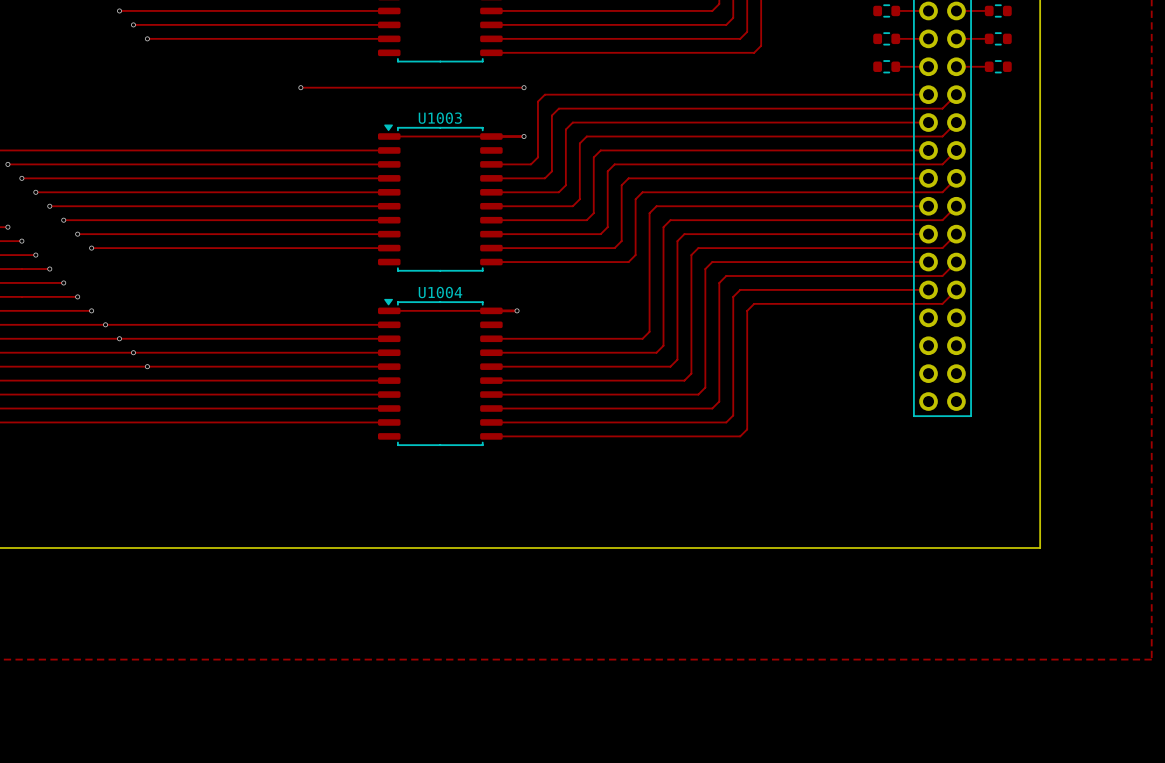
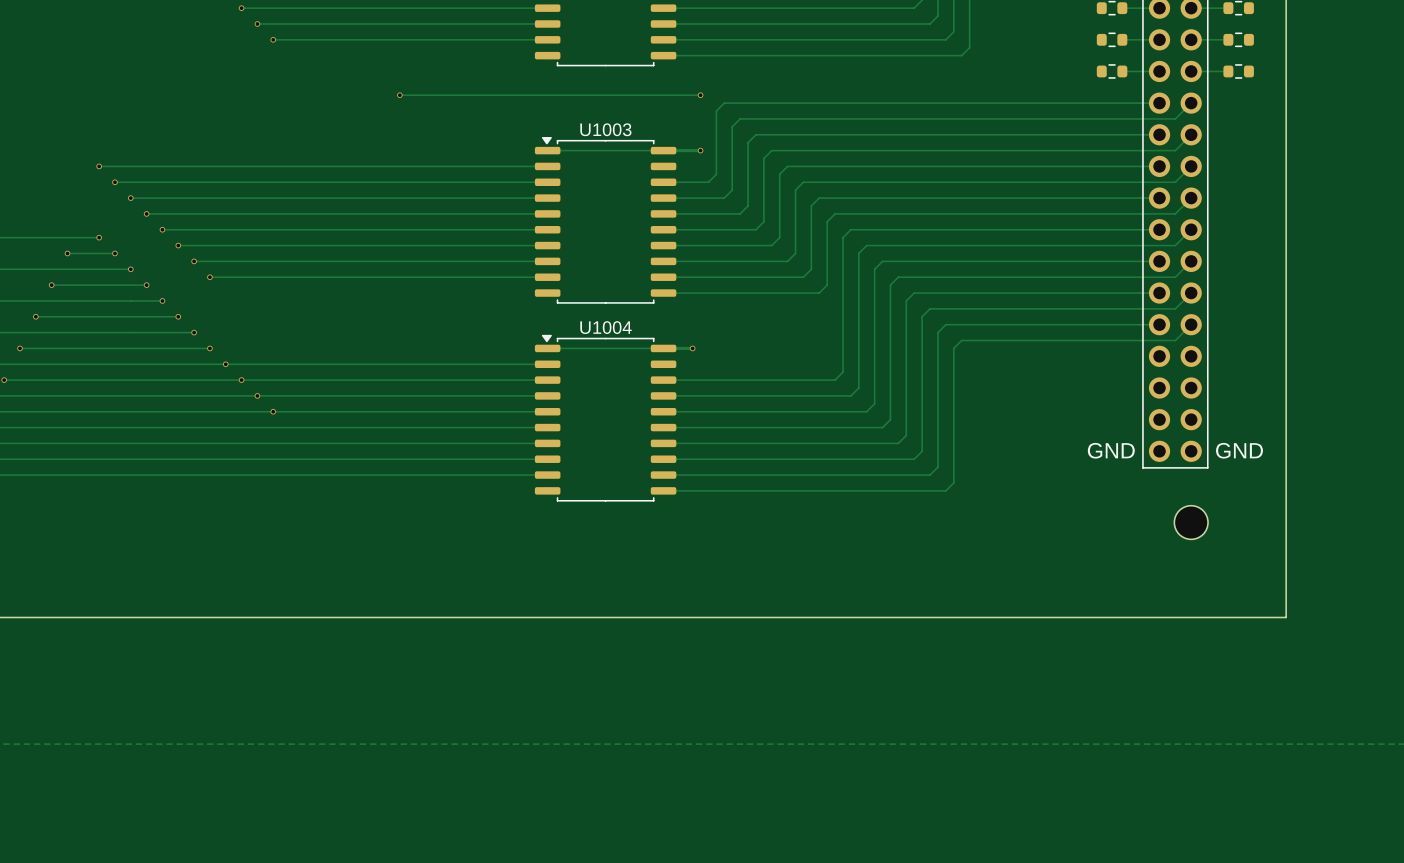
track: none -> (399, 95) (447, 95)
via position: (300, 87) -> (399, 95)
text: none -> GND (1111, 450)
text: none -> GND (1239, 450)
part: none -> (1191, 522)

